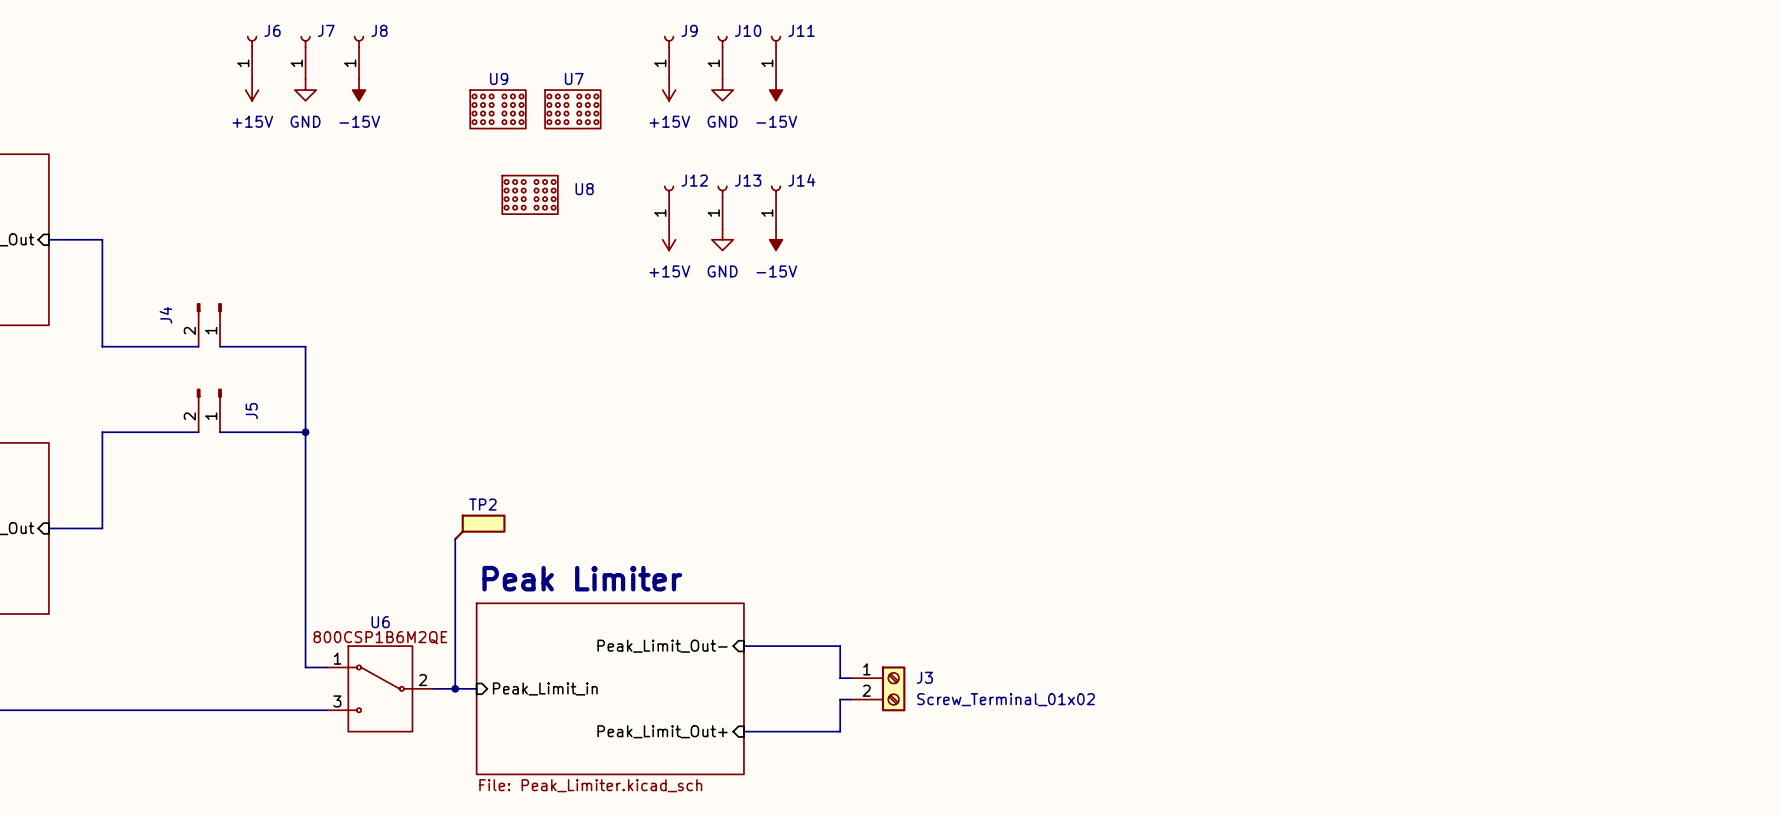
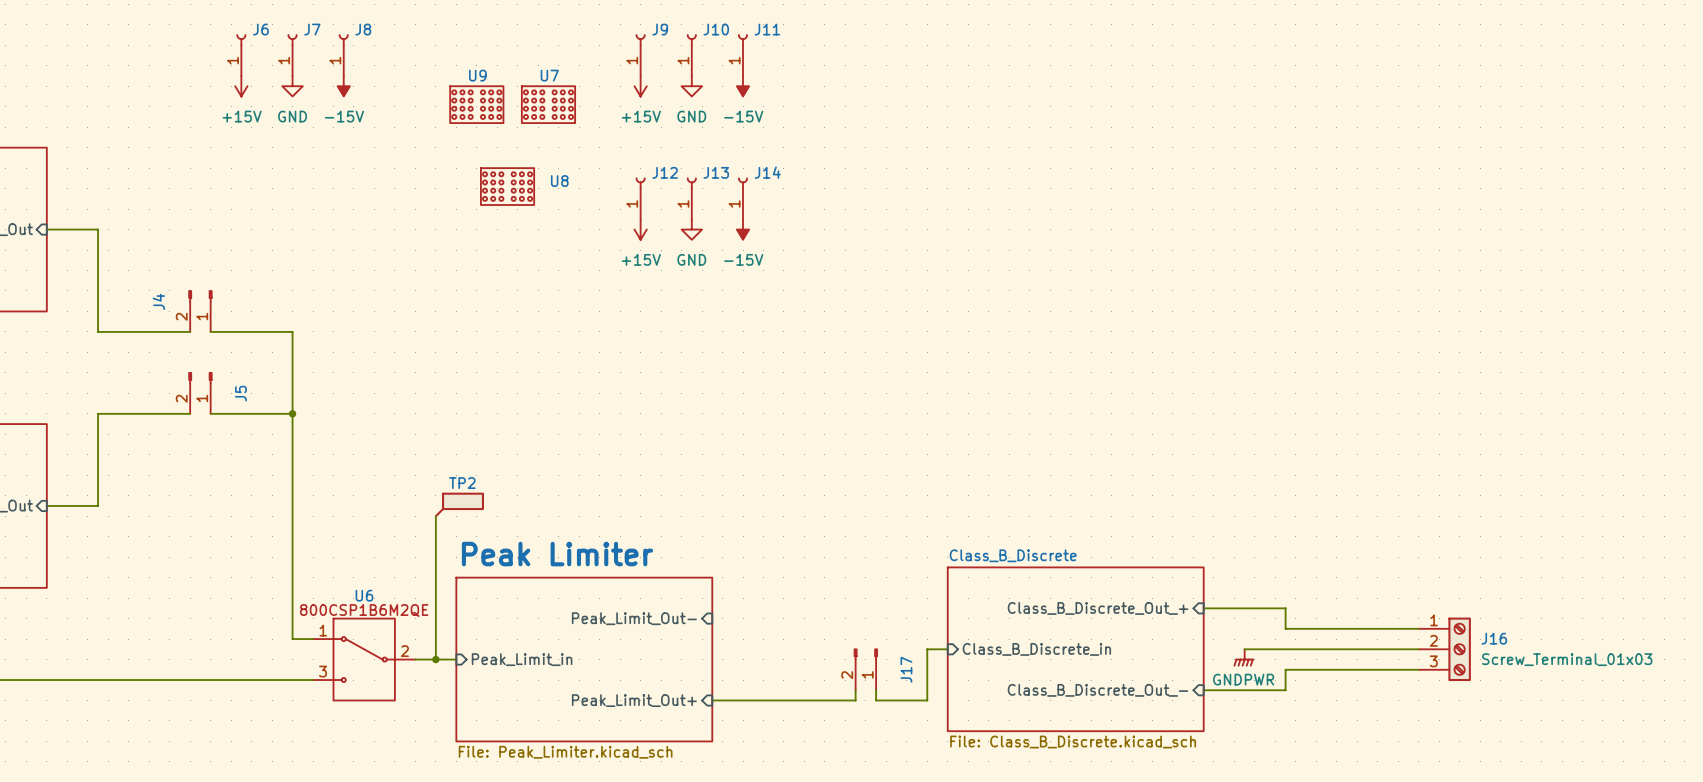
sheet pin: none -> Class_B_Discrete_Out_+ (1097, 608)
wire: none -> (1203, 608) (1285, 608) (1285, 628) (1418, 628)
wire: (743, 646) (840, 646) (840, 678) (850, 678) -> none
wire: none -> (947, 649) (927, 649) (927, 700) (876, 700) (876, 690)
sheet pin: none -> Class_B_Discrete_in (1036, 649)
sheet Class_B_Discrete: none -> File: Class_B_Discrete.kicad_sch (1075, 649)
wire: none -> (1244, 649) (1418, 649)
J16: none -> Screw_Terminal_01x03 (1444, 649)
power symbol: none -> GNDPWR (1243, 657)
J3: Screw_Terminal_01x02 (878, 688) -> none
wire: (850, 699) (840, 699) (840, 731) -> (855, 690) (855, 700) (804, 700)
J17: none -> (865, 669)
wire: none -> (1418, 669) (1285, 669) (1285, 690) (1203, 690)
sheet pin: none -> Class_B_Discrete_Out_- (1097, 690)

